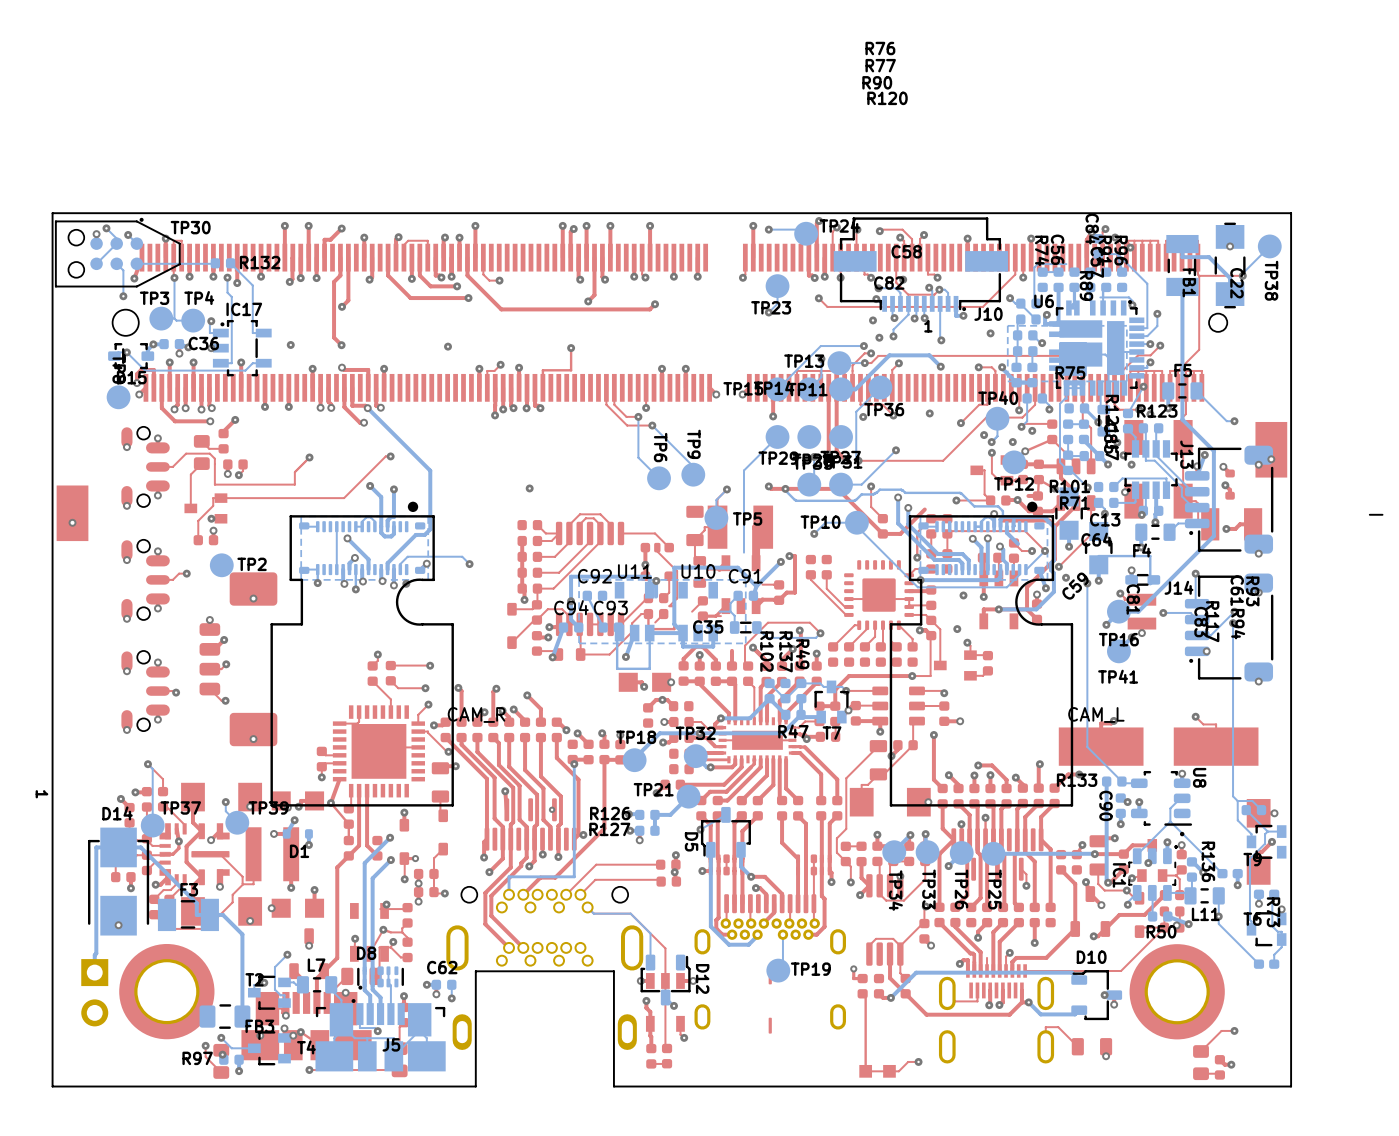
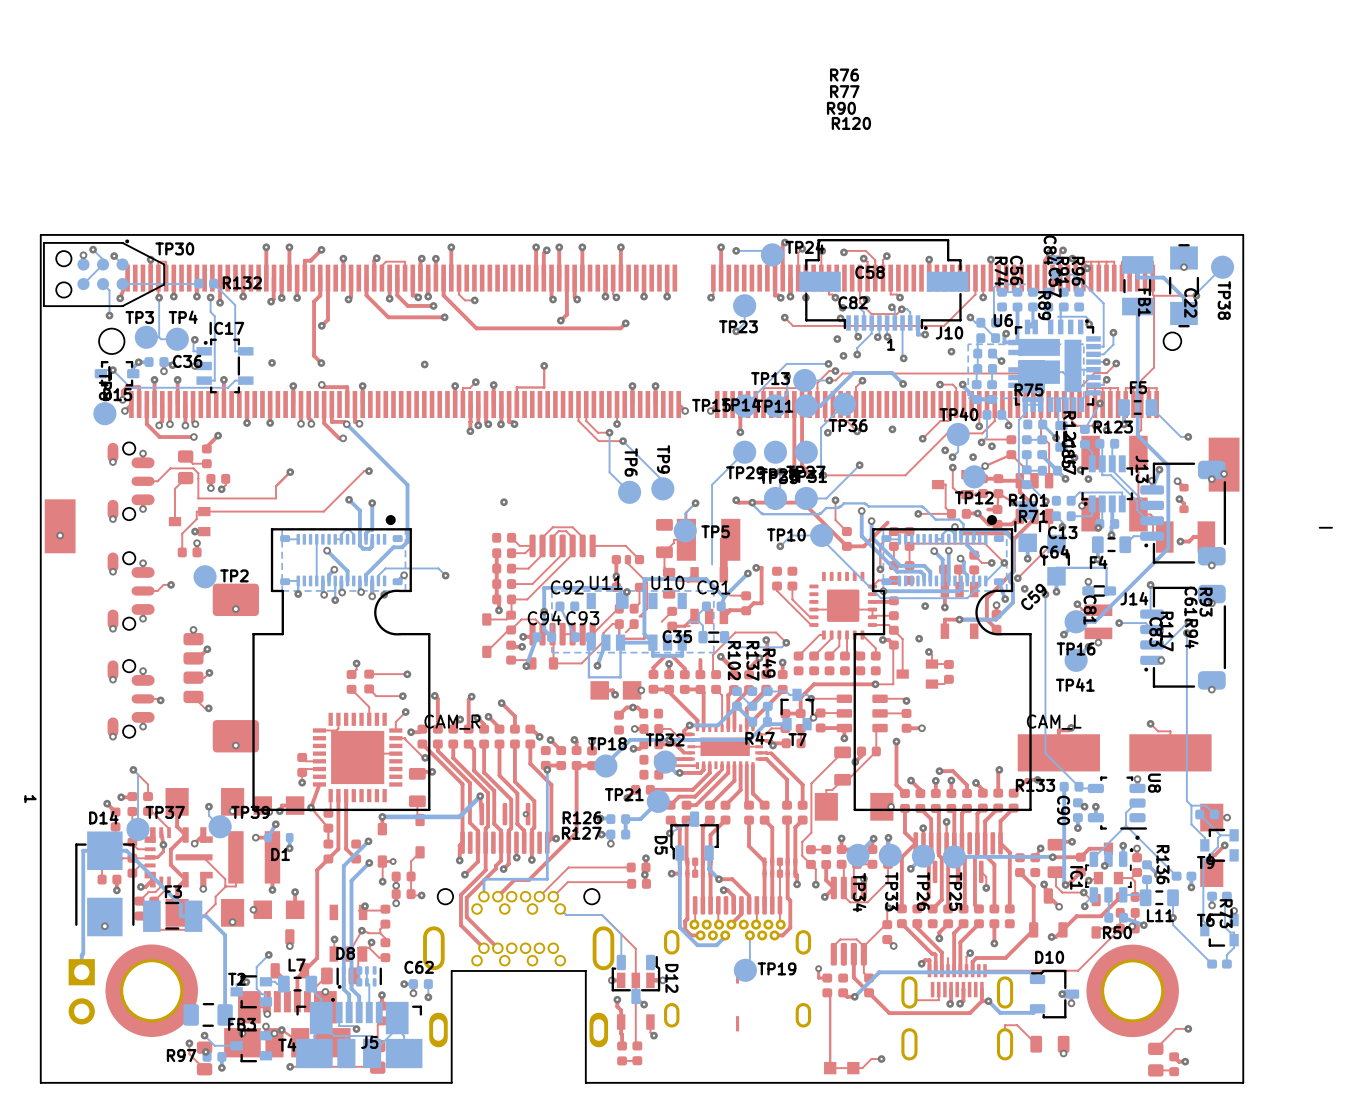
bottom track: none -> (480, 796) (459, 816) (382, 816)

